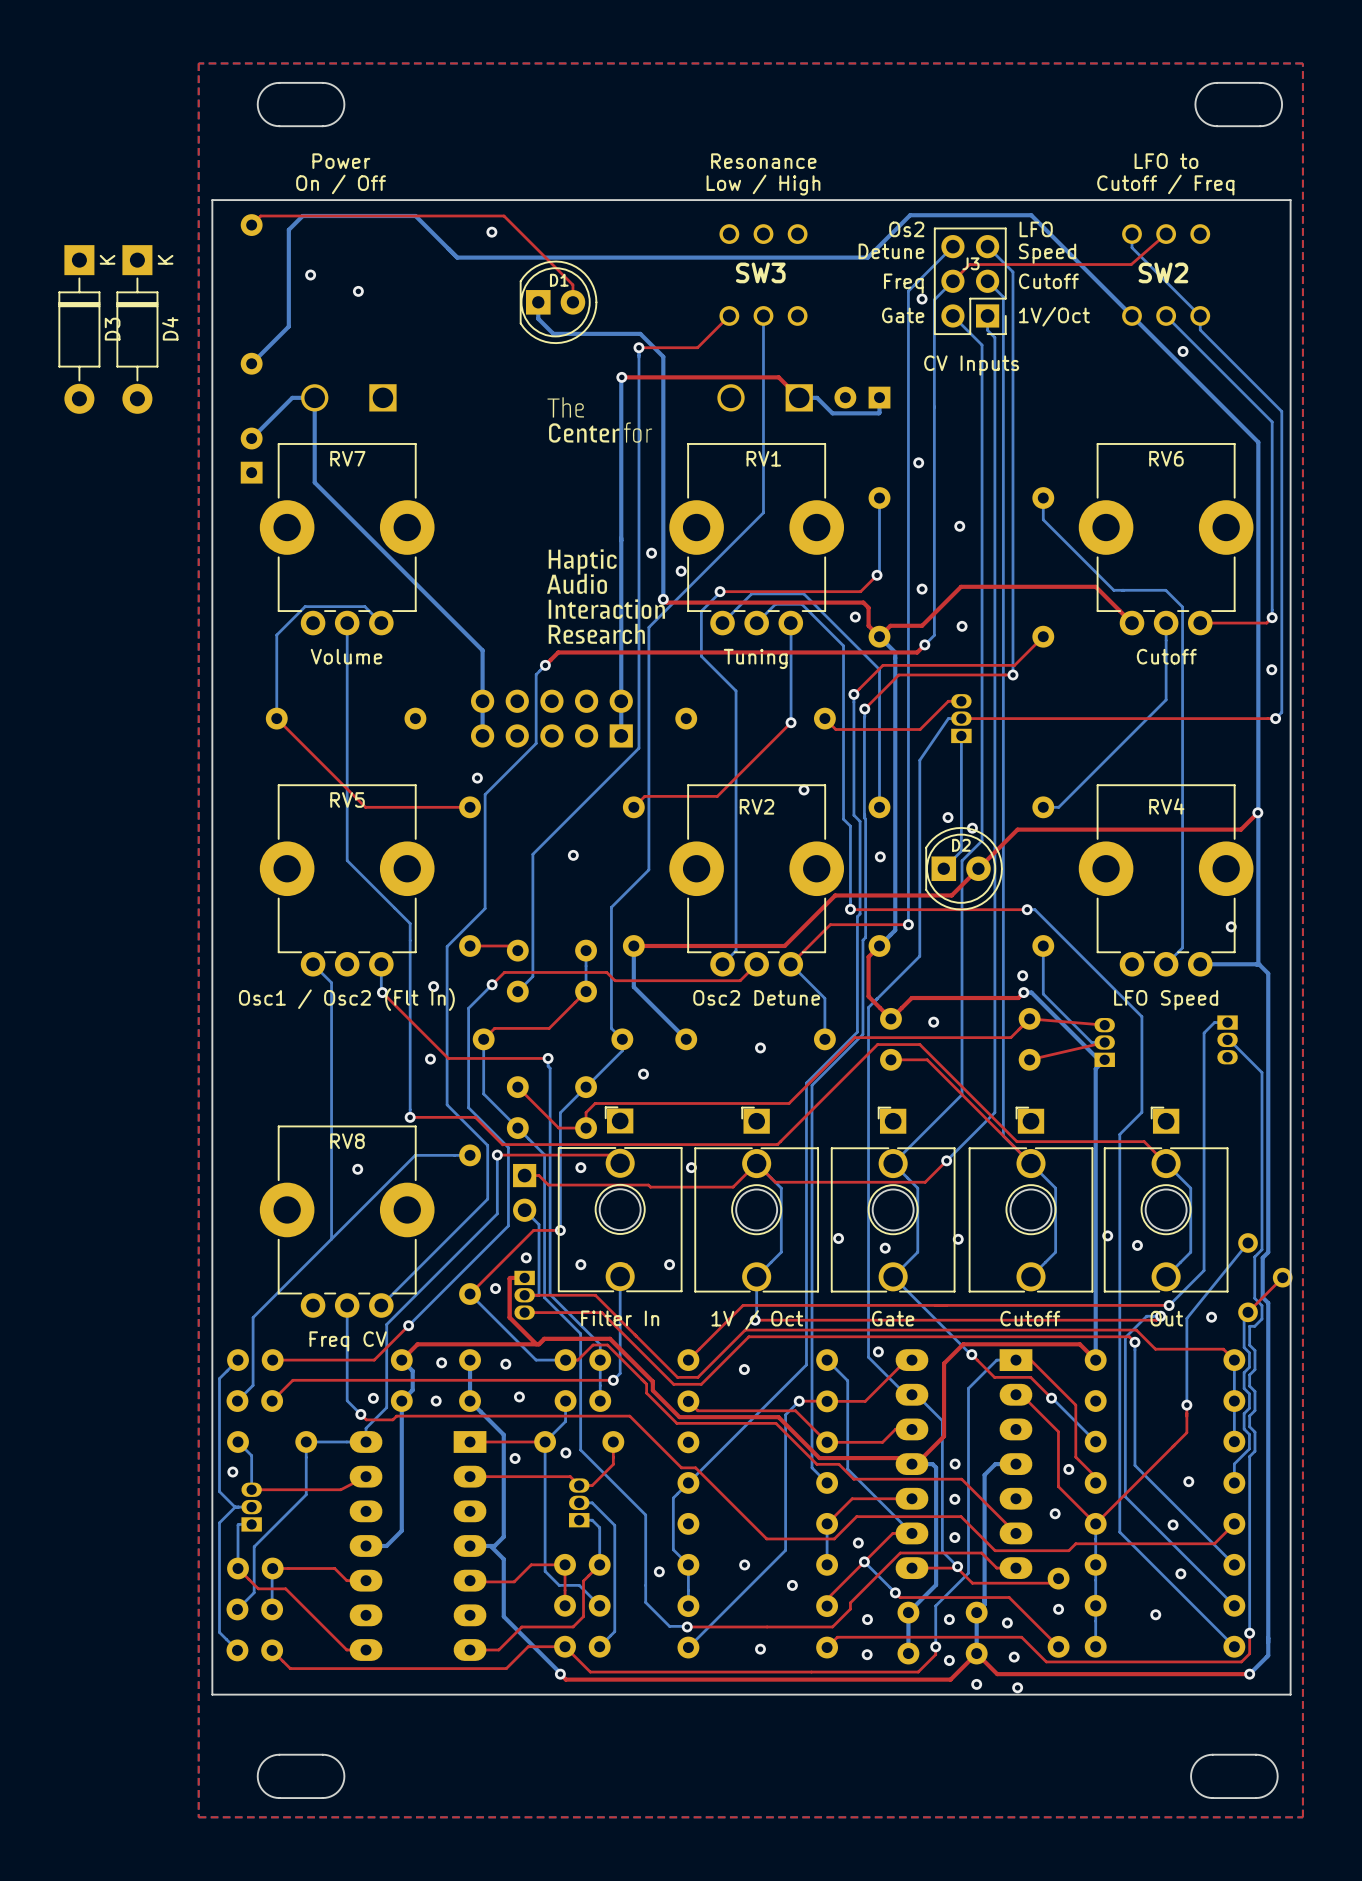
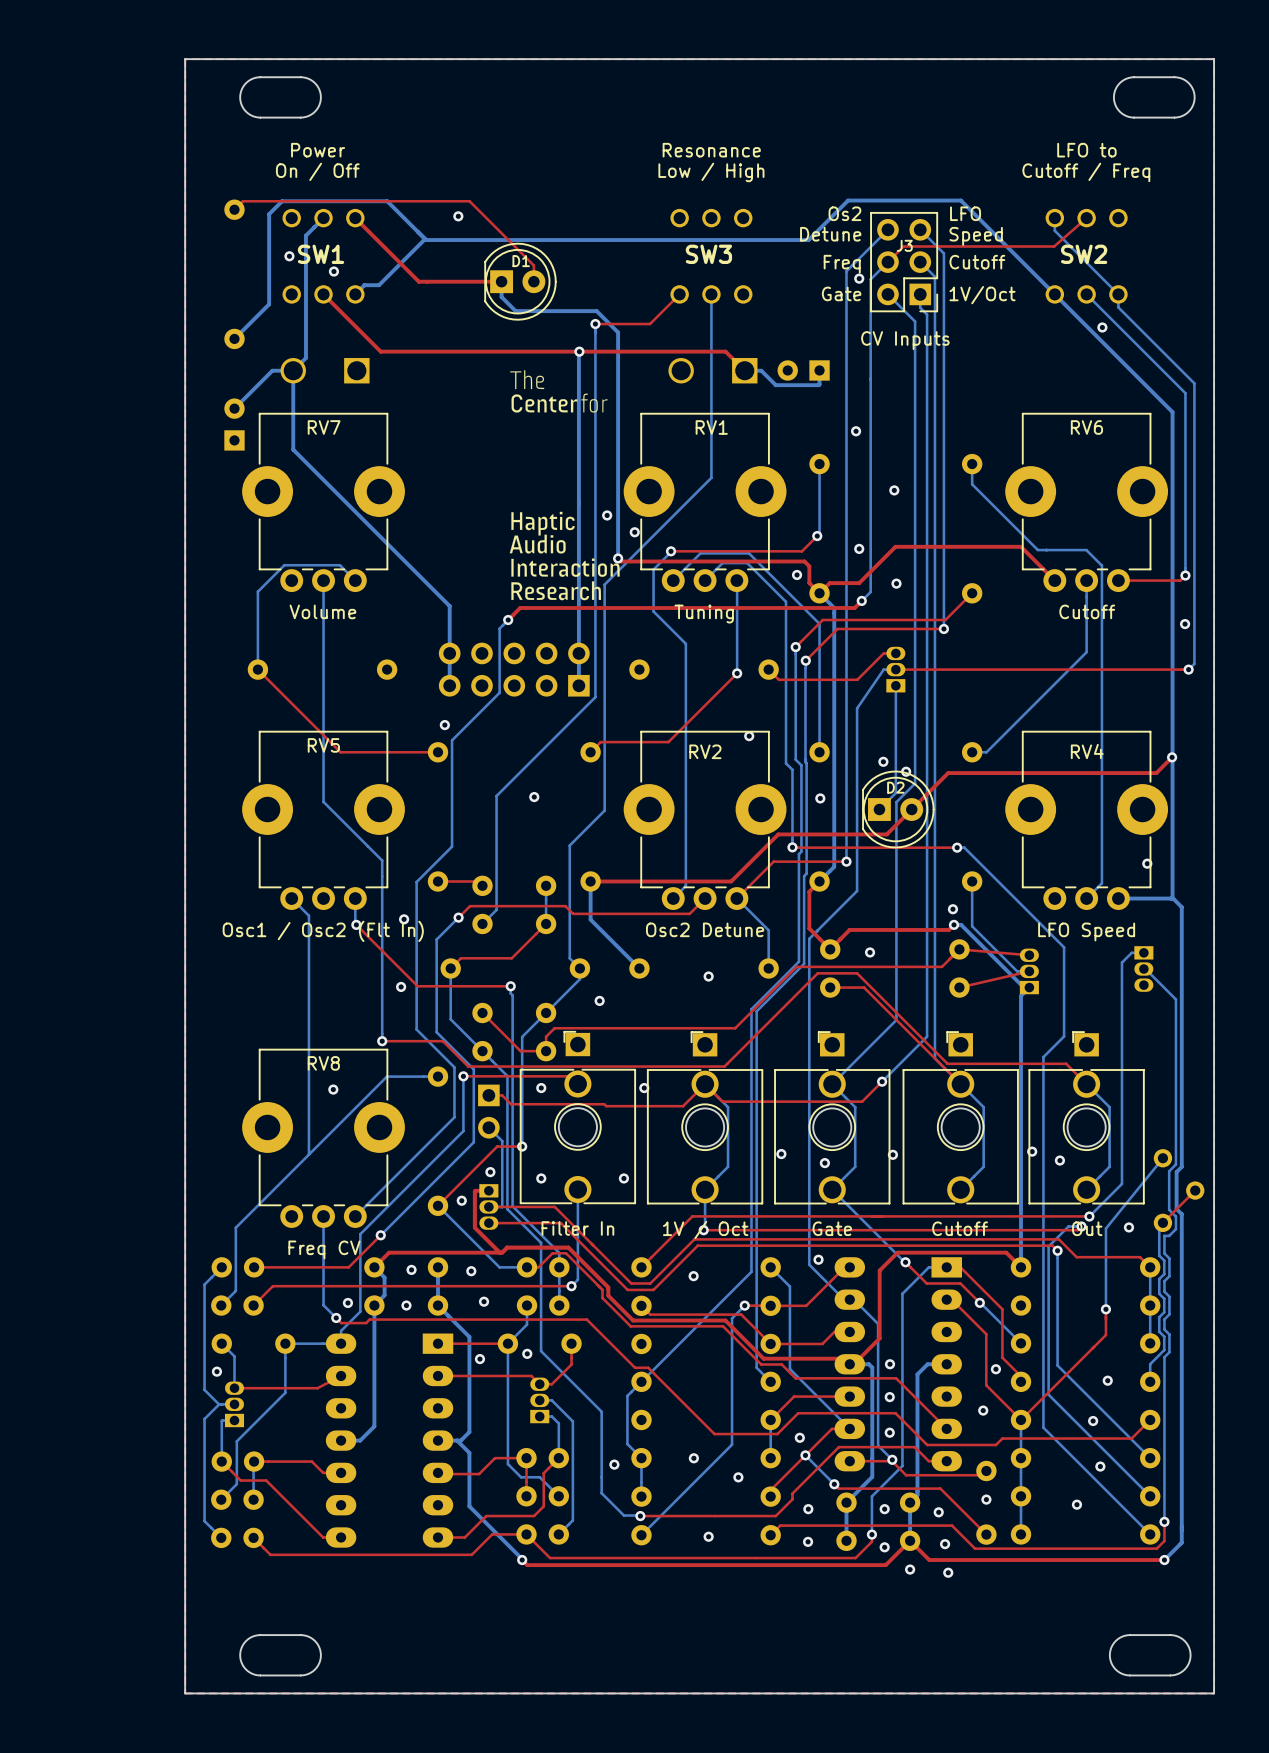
board edge: (212, 200) (212, 1694) (1290, 1694) (1290, 200) (212, 200) -> (185, 59) (185, 1693) (1214, 1693) (1214, 59) (185, 59)
bottom track: none -> (323, 218) (305, 235) (305, 358) (293, 370)
top track: none -> (355, 218) (418, 281) (501, 281)
bottom track: none -> (425, 239) (379, 285) (364, 285) (355, 294)
SW1: none -> (323, 256)
top track: none -> (323, 294) (380, 351) (579, 351)
D3: (79, 329) -> none
D4: (137, 329) -> none

